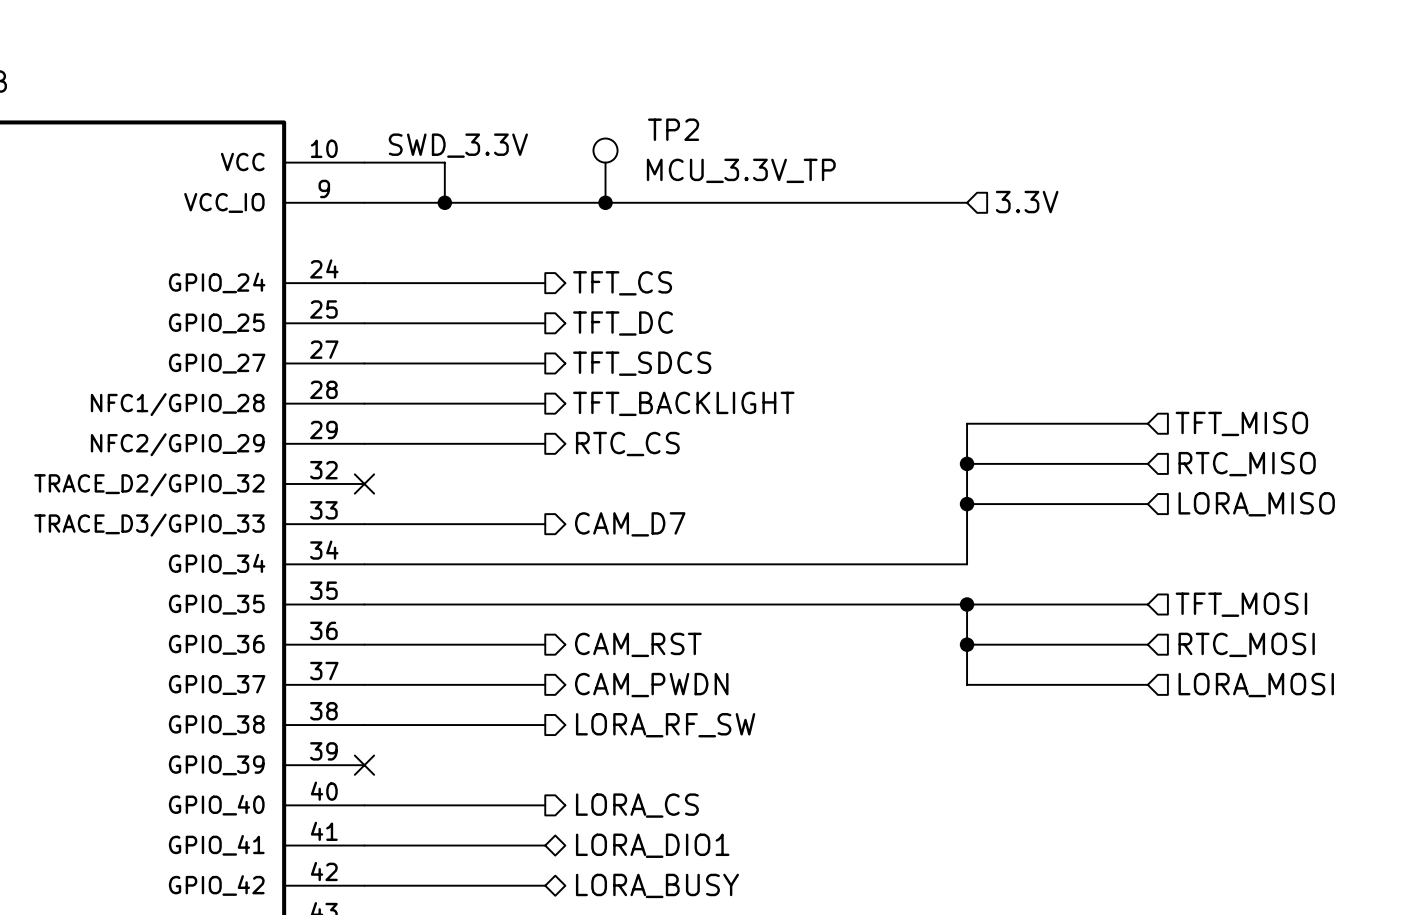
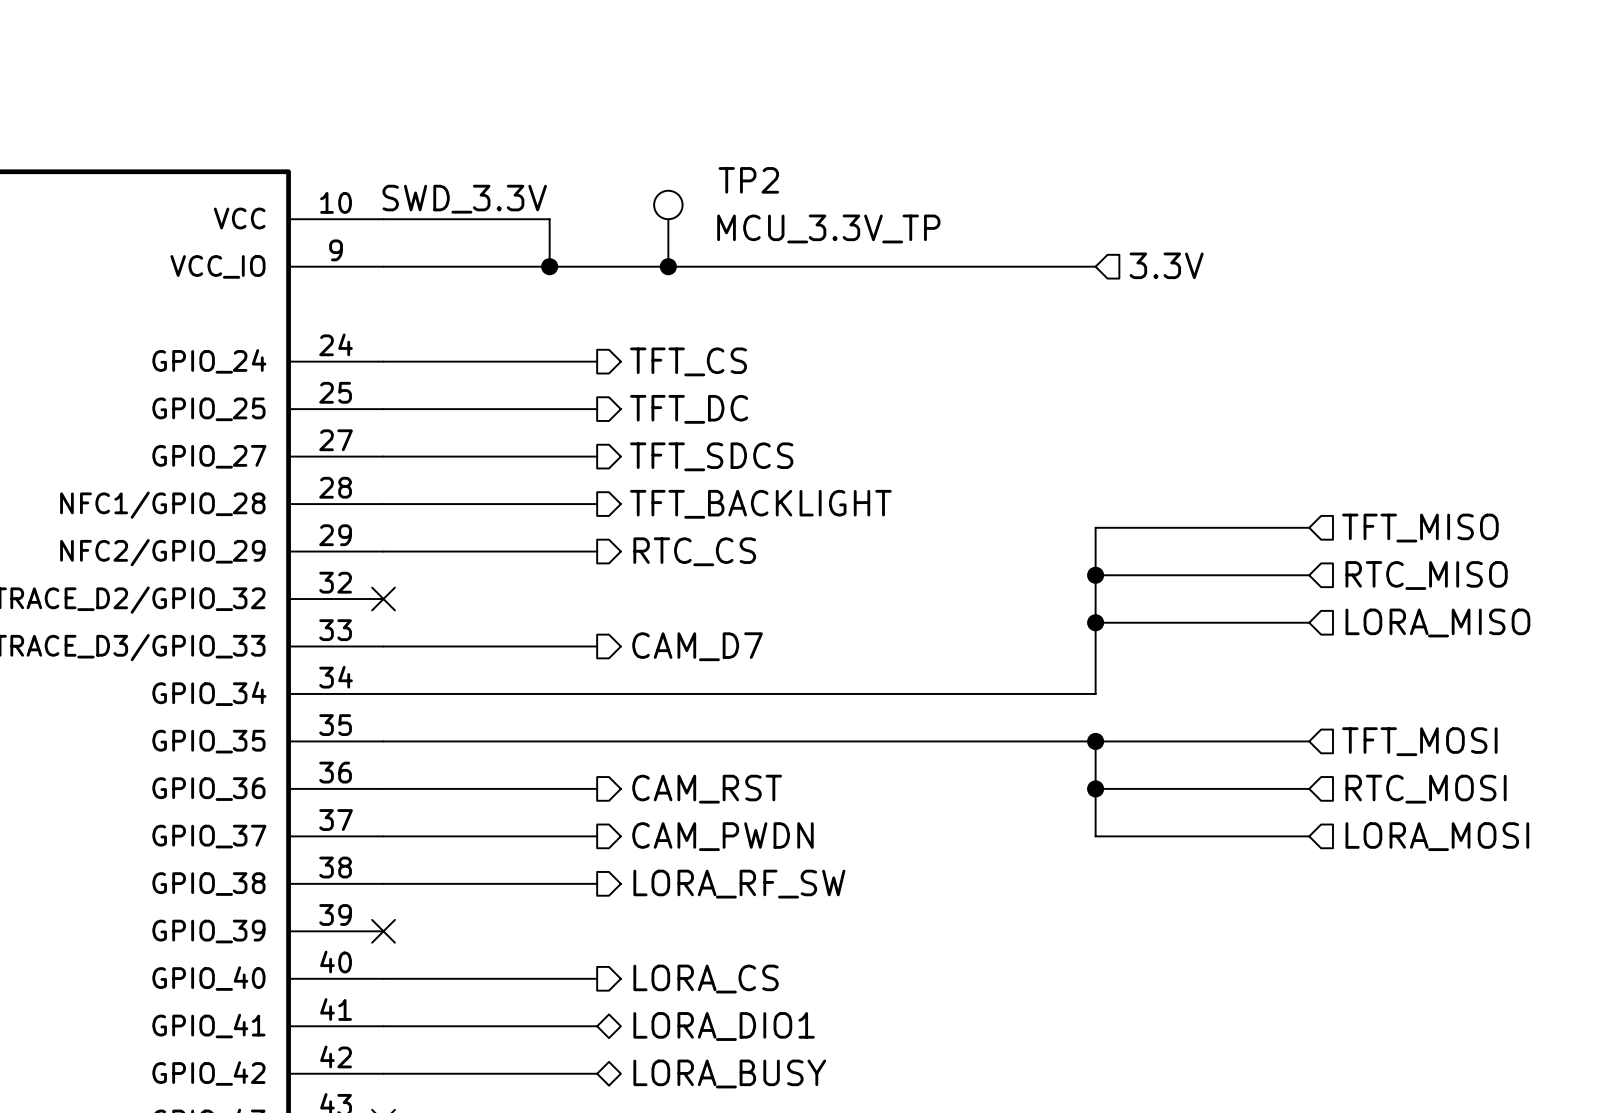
label position: SWD_3.3V (458, 145) -> SWD_3.3V (464, 199)
wire: (444, 162) (444, 202) -> (478, 219) (549, 219) (549, 266)
junction position: (444, 202) -> (549, 266)

